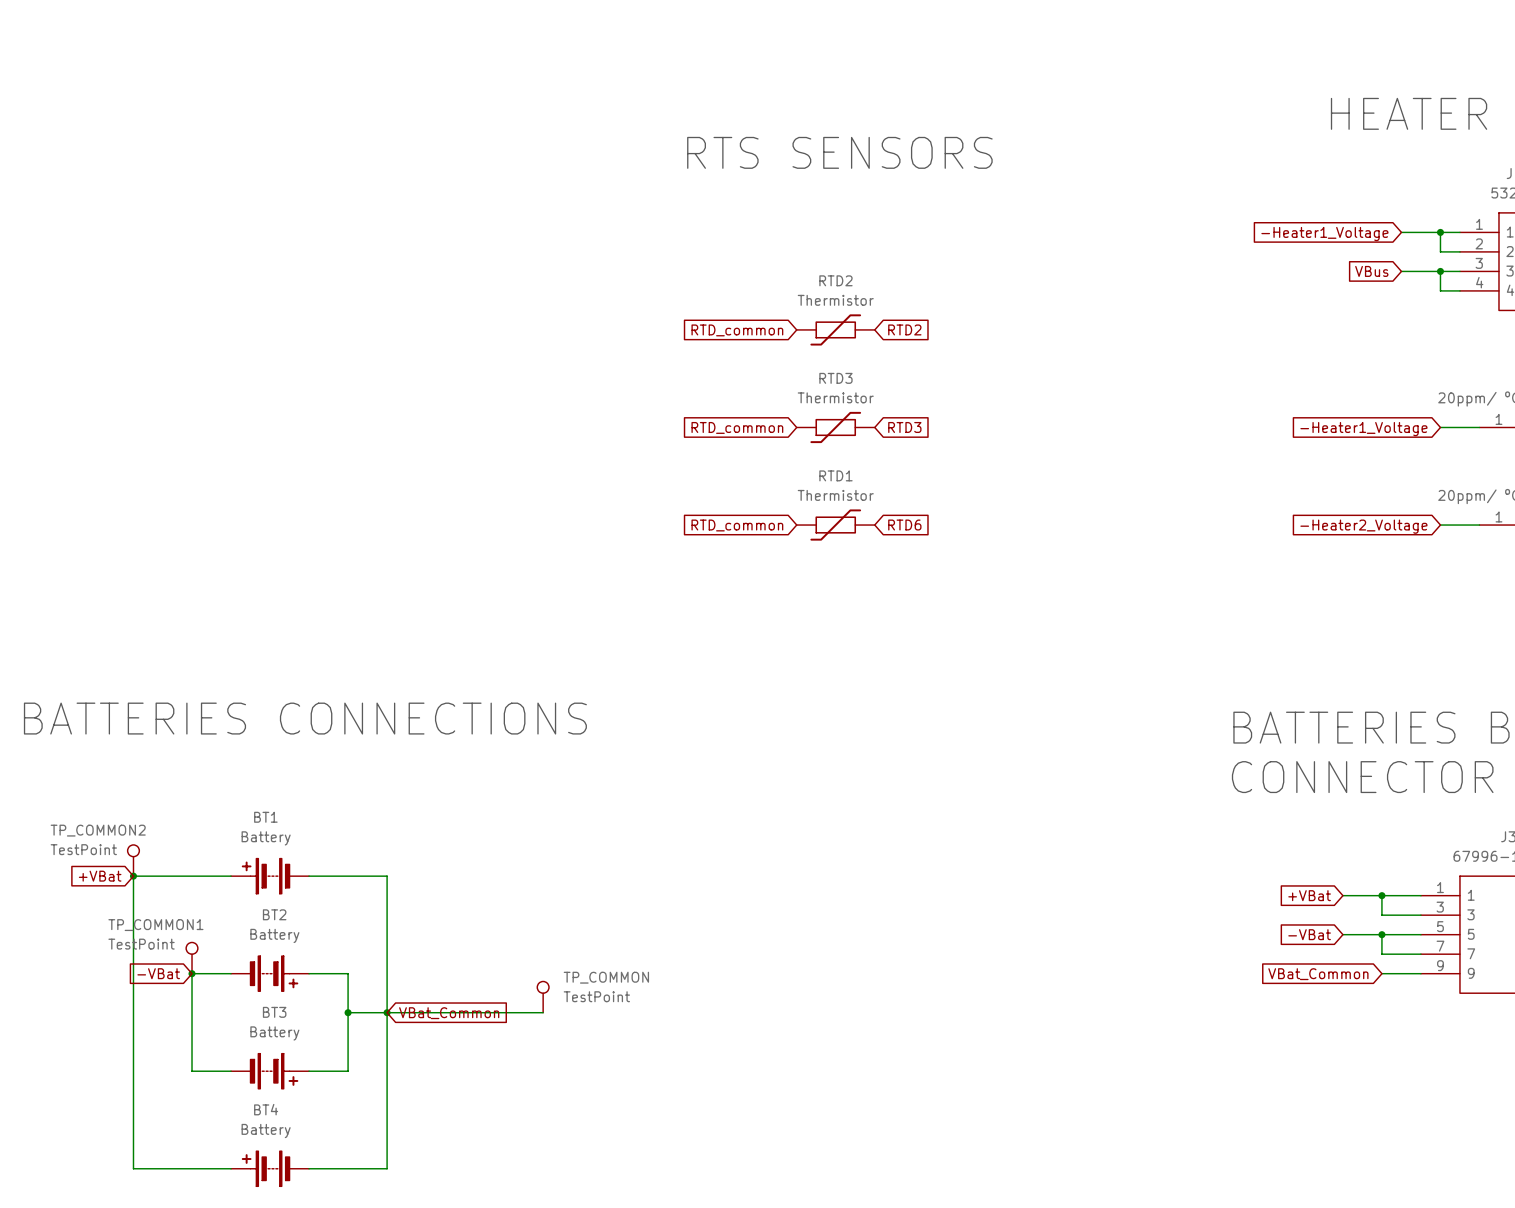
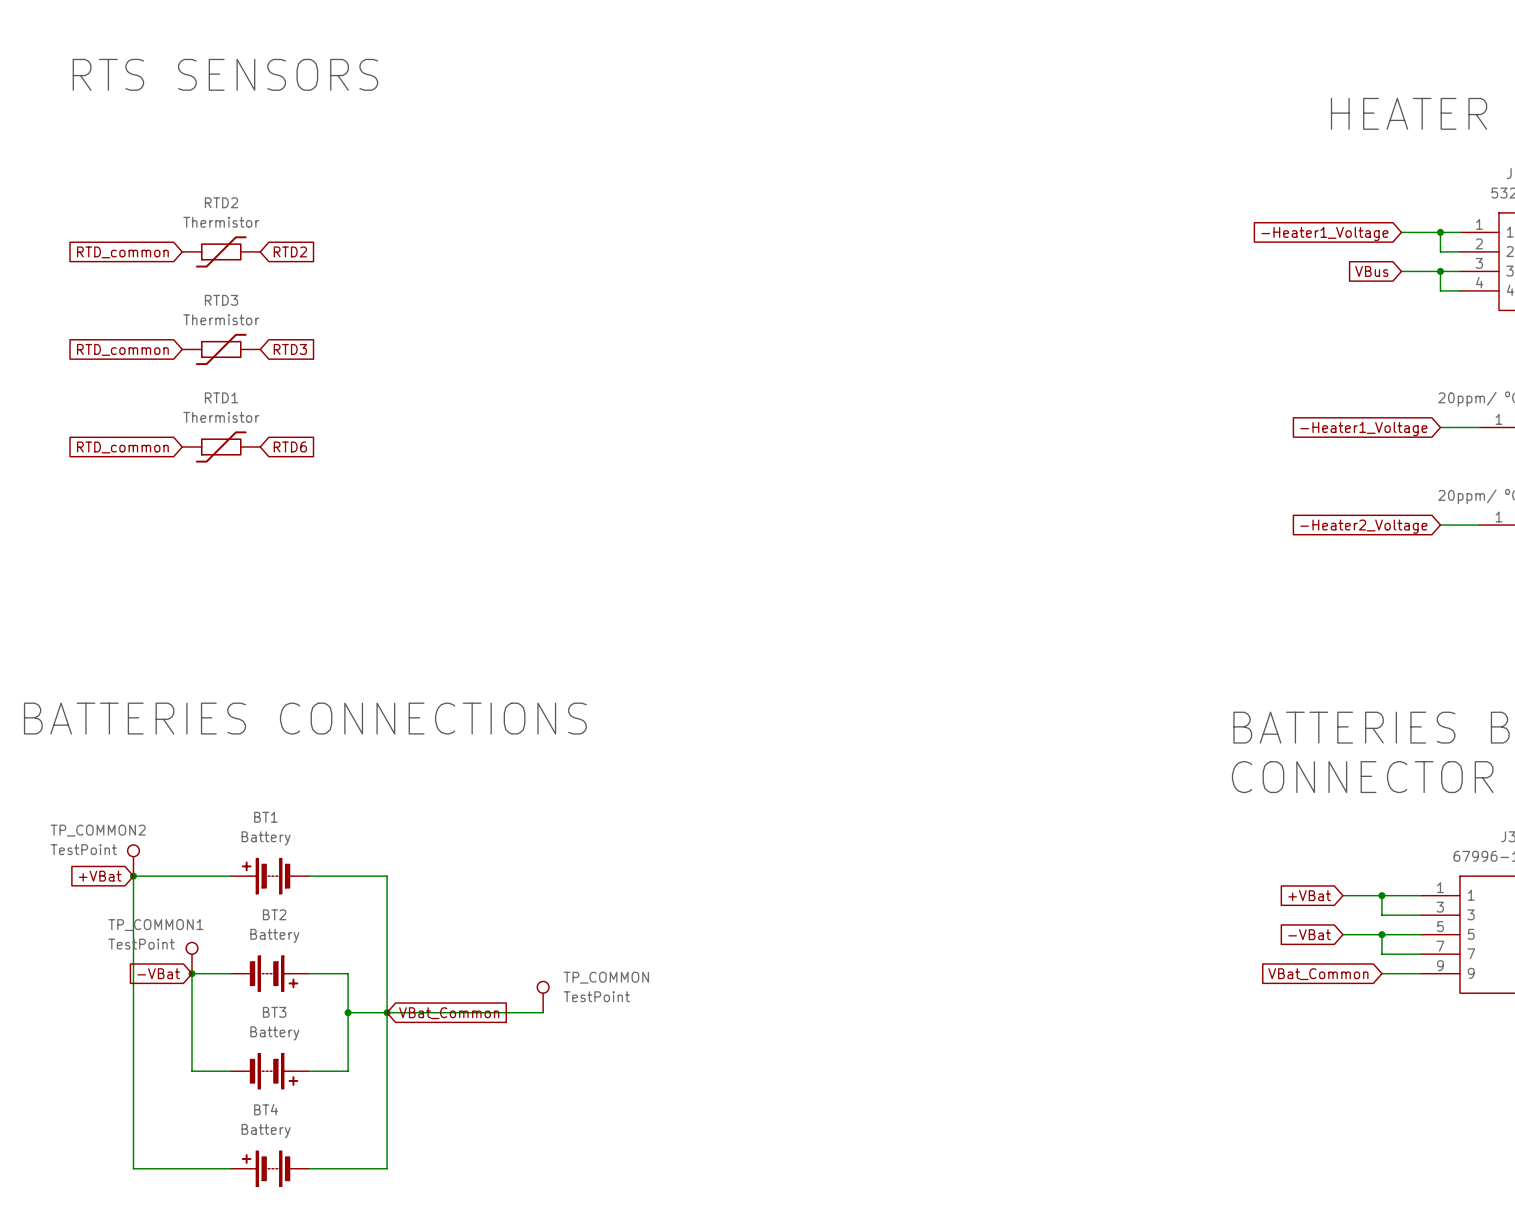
text: none -> RTS SENSORS (225, 74)
text: RTS SENSORS (839, 152) -> none
global label: none -> RTD2 (290, 251)
global label: none -> RTD_common (122, 252)
RTD2 position: (835, 329) -> (221, 251)
global label: RTD2 (904, 329) -> none
global label: RTD_common (737, 330) -> none
global label: none -> RTD_common (122, 349)
global label: none -> RTD3 (290, 349)
global label: RTD_common (737, 427) -> none
RTD3 position: (835, 427) -> (221, 349)
global label: RTD3 (904, 427) -> none
global label: none -> RTD6 (290, 446)
global label: none -> RTD_common (122, 447)
global label: RTD_common (737, 525) -> none
RTD1 position: (835, 525) -> (221, 446)
global label: RTD6 (904, 525) -> none

